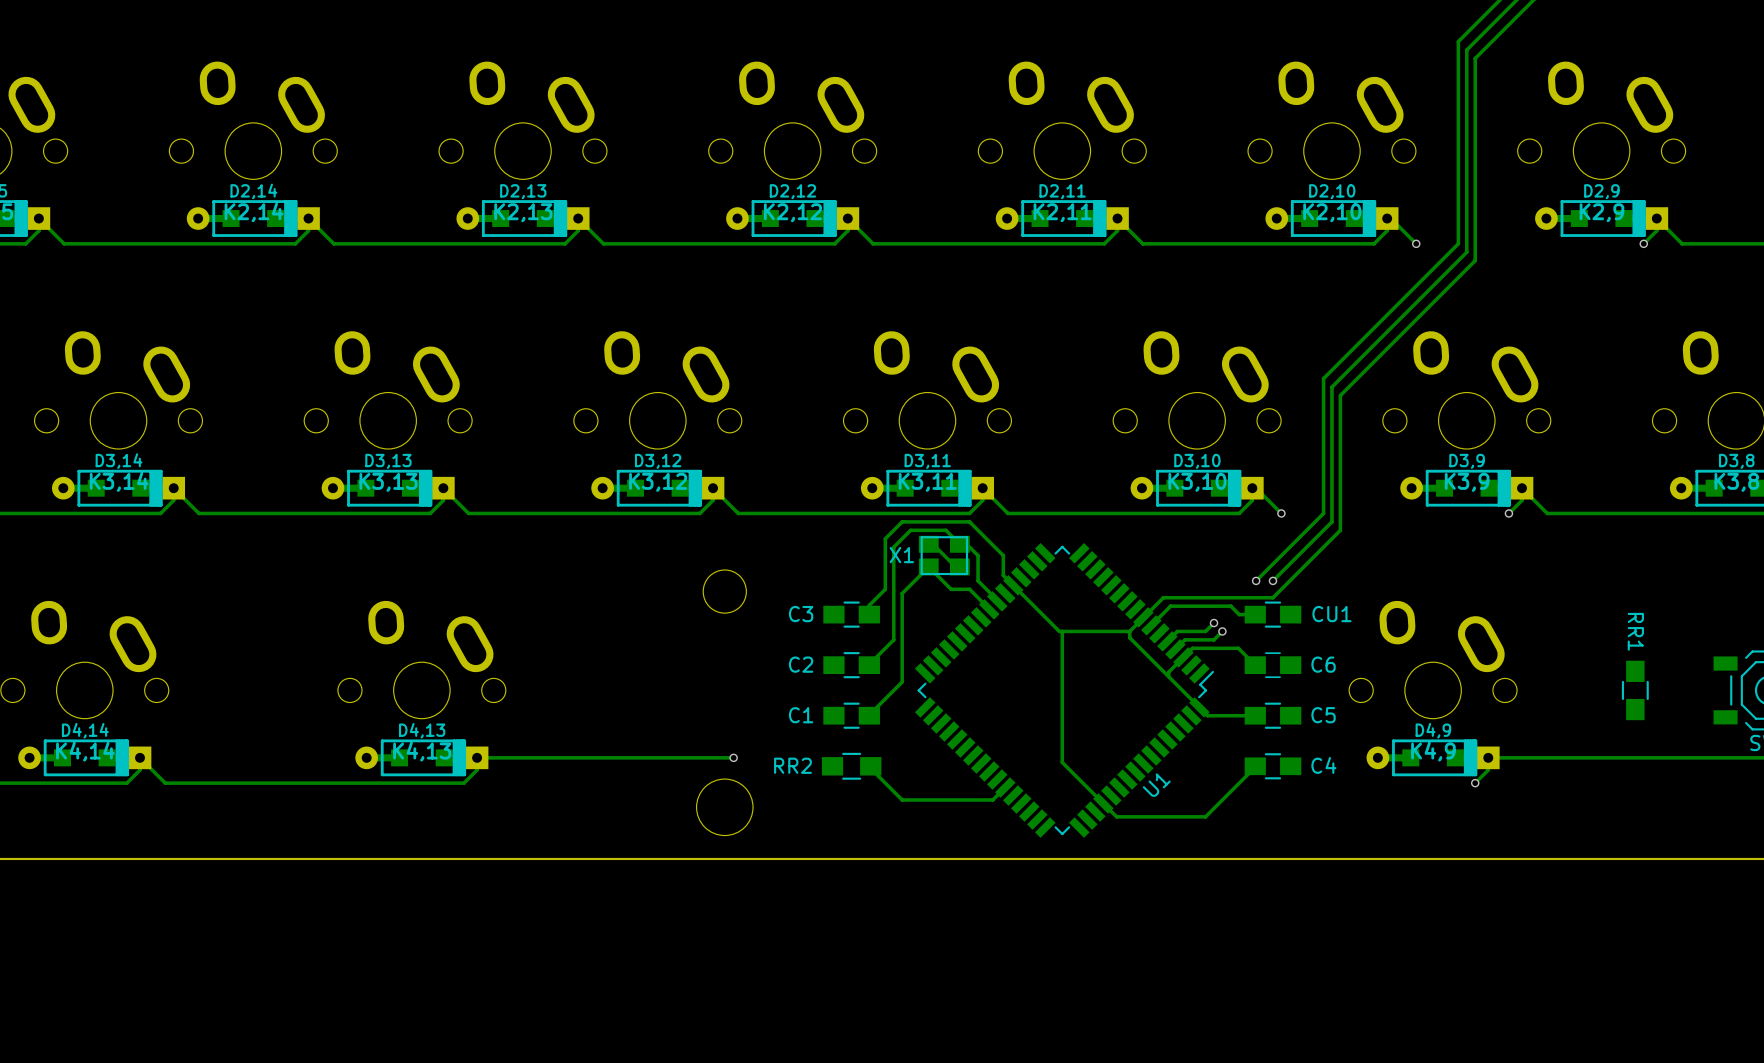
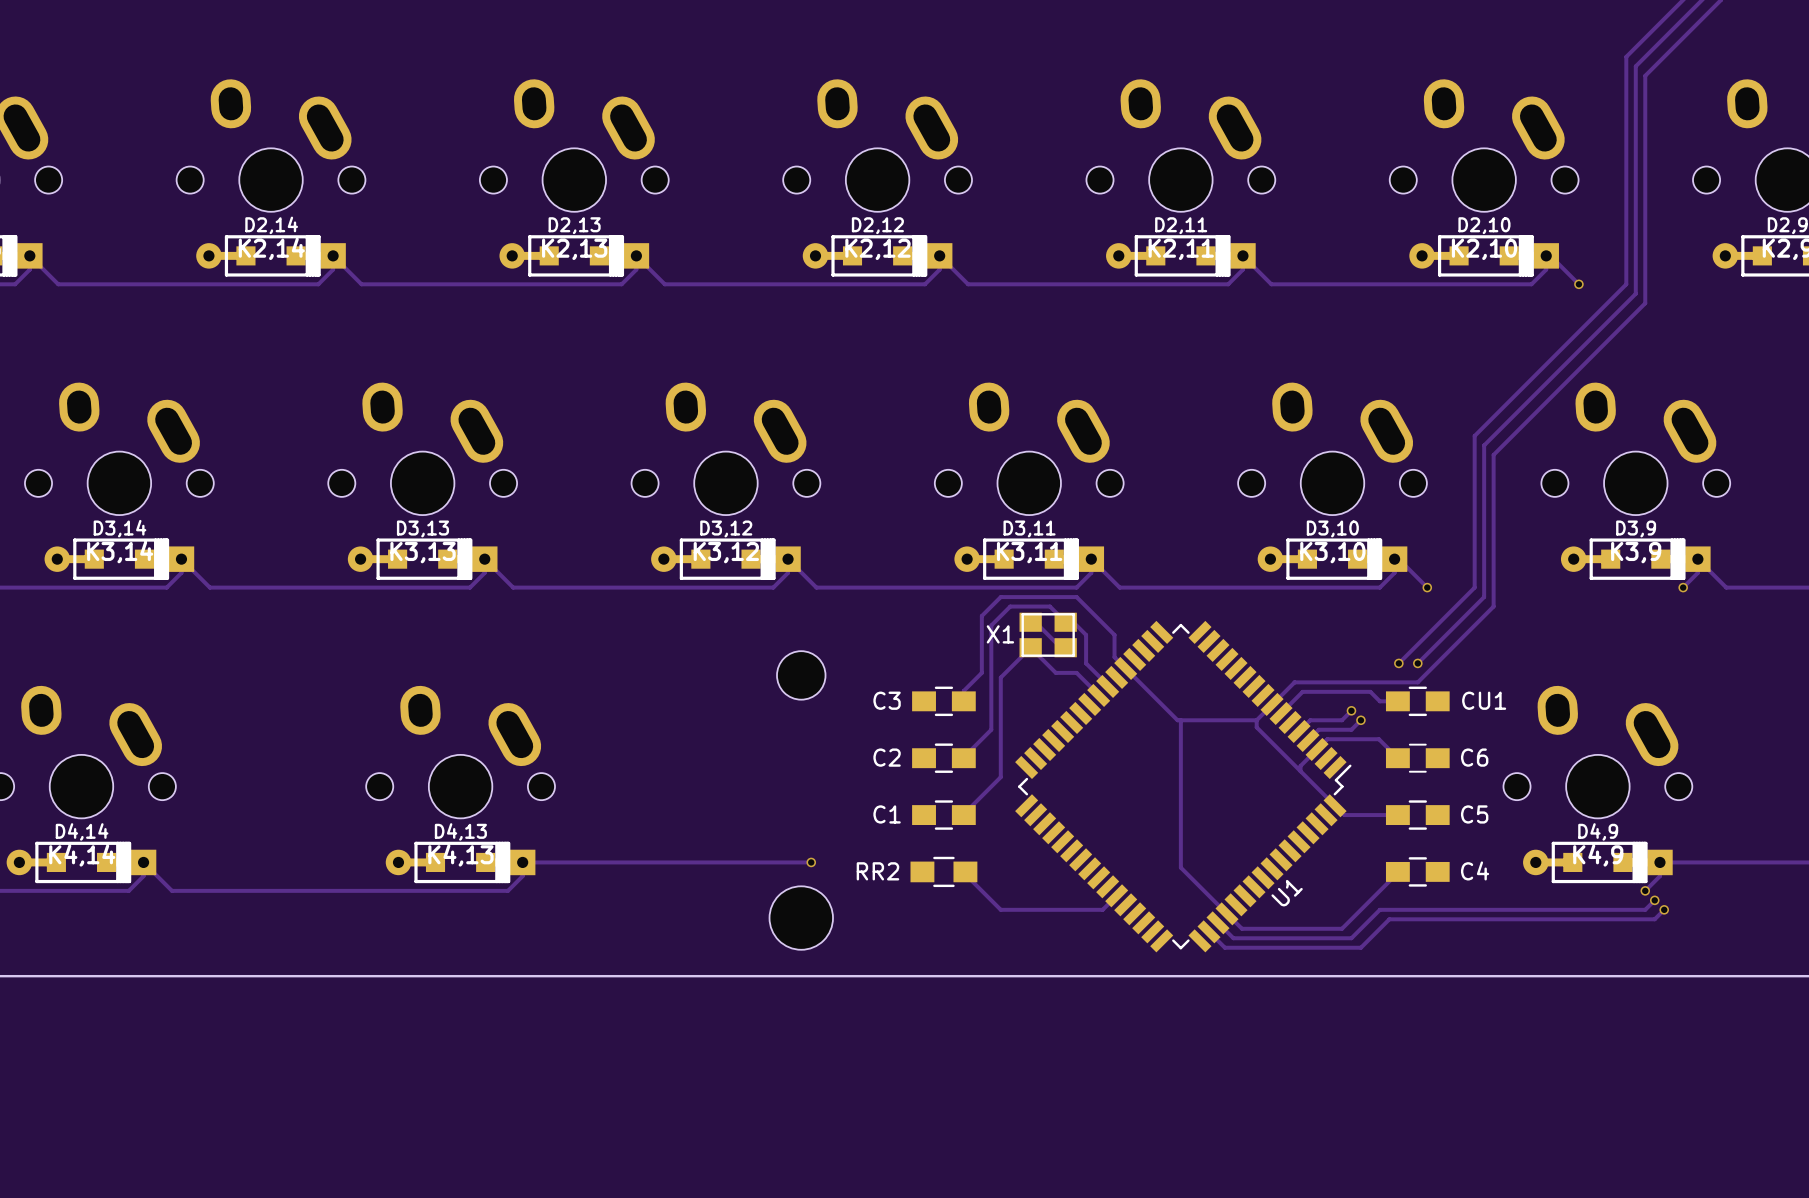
track: none -> (1654, 900) (1645, 909) (1379, 909) (1351, 938) (1233, 938) (1218, 922)
via: none -> (1654, 900)
track: none -> (1664, 909) (1654, 919) (1389, 919) (1360, 947) (1224, 947) (1209, 931)
via: none -> (1664, 909)

